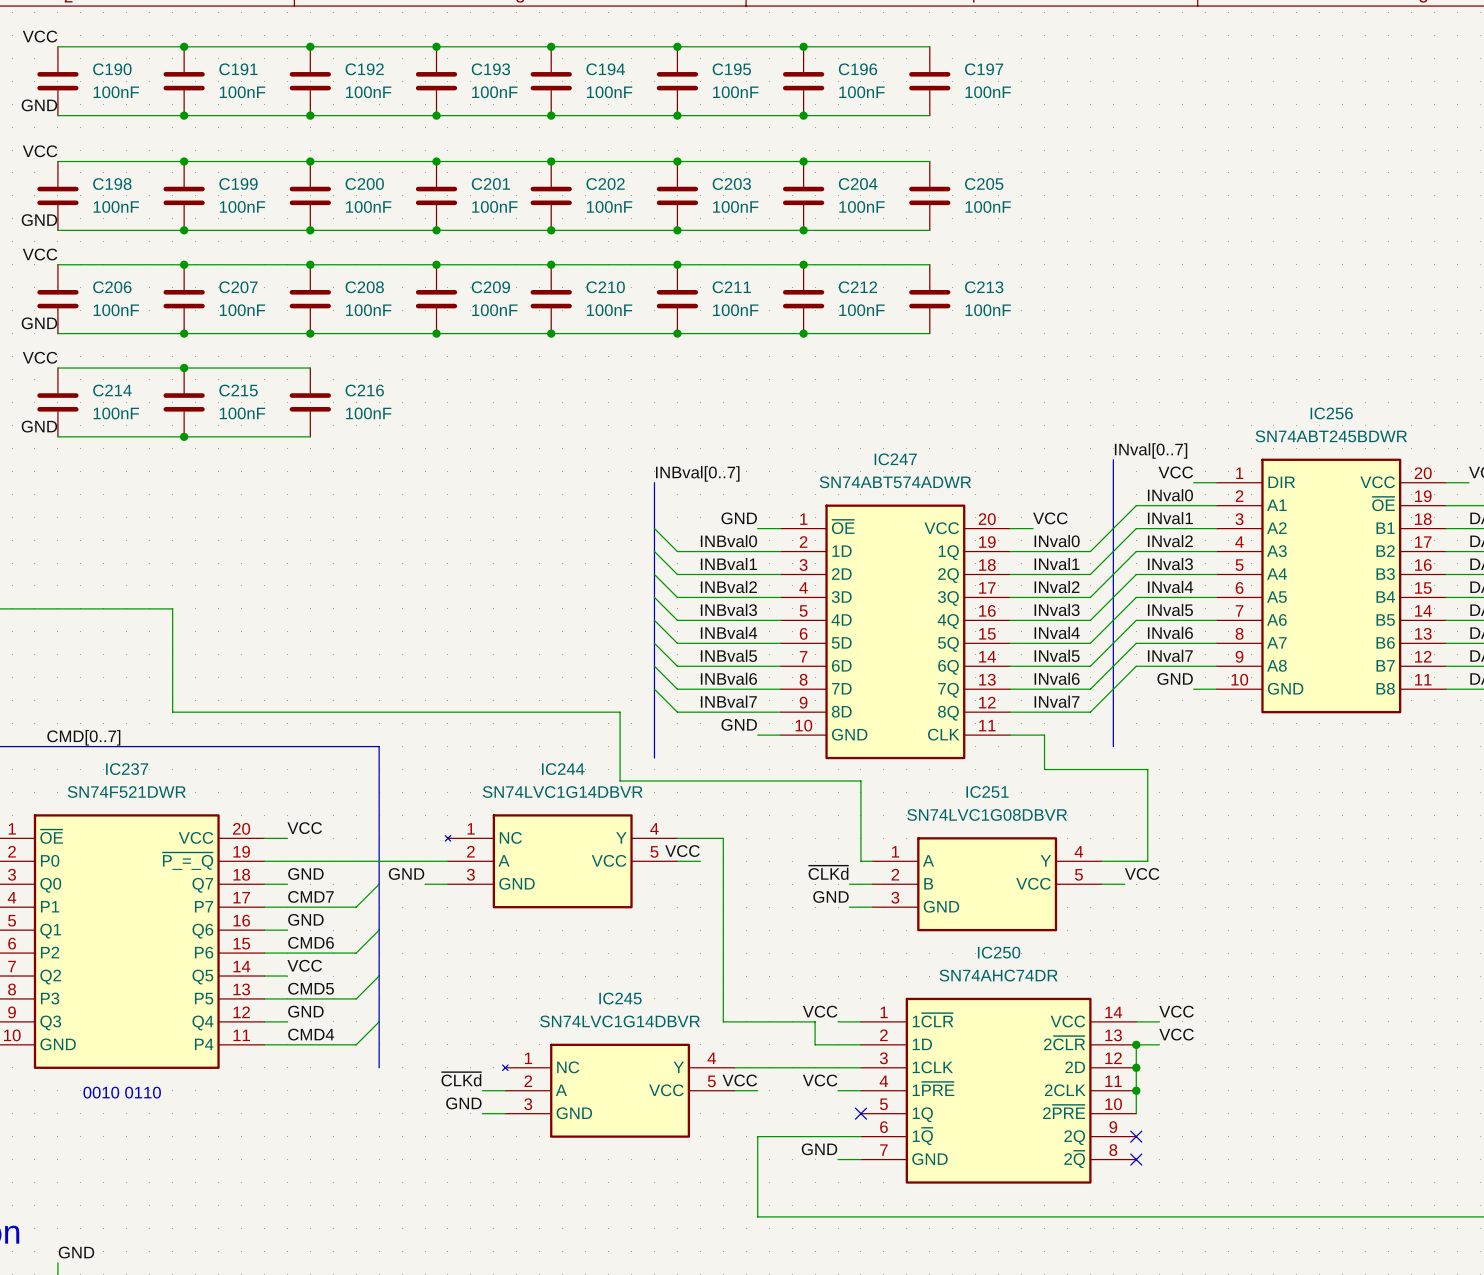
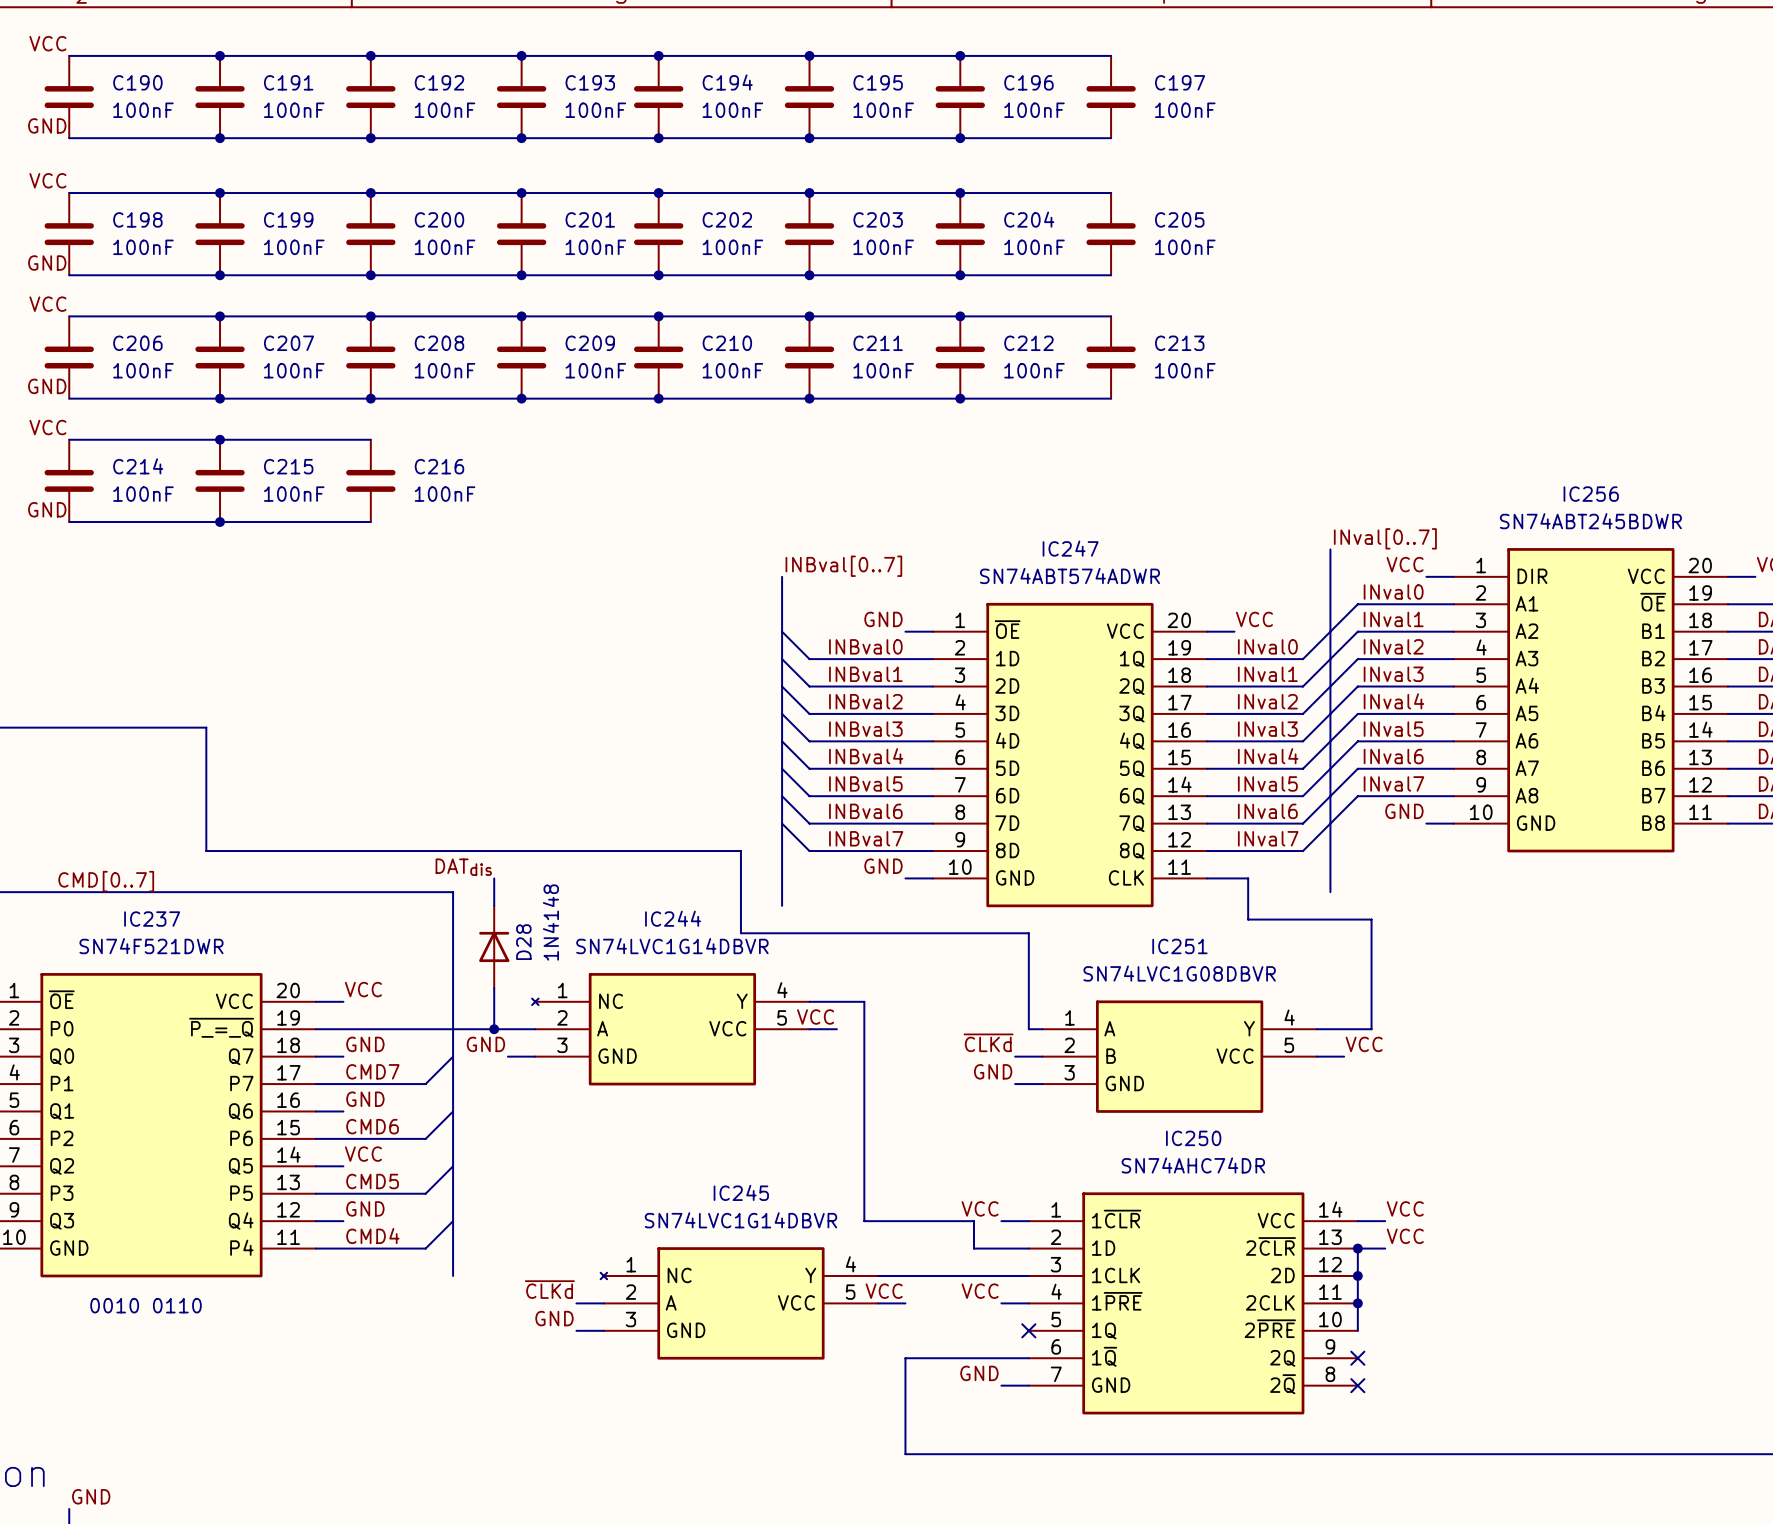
label: none -> DATdis (463, 867)
wire: none -> (494, 878) (494, 905)
D28: none -> 1N4148 (494, 946)
wire: none -> (494, 988) (494, 1029)
junction: none -> (494, 1029)

